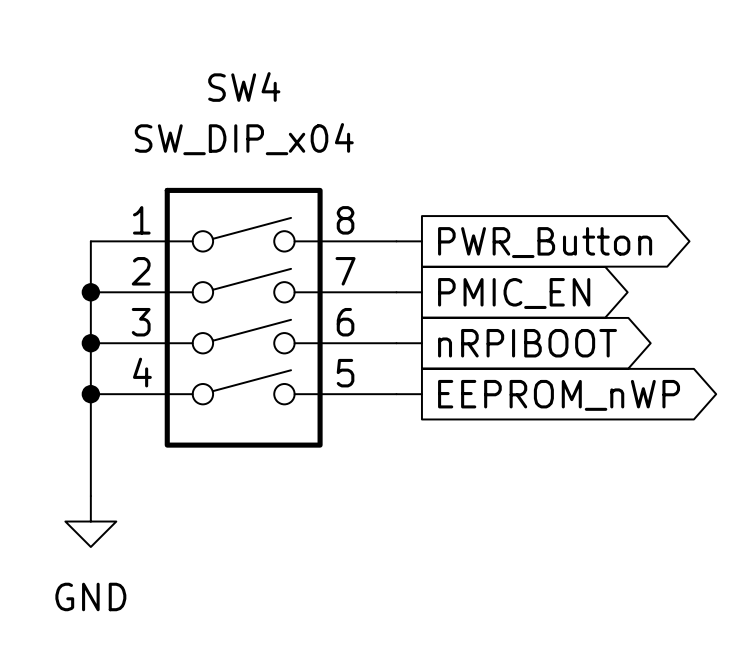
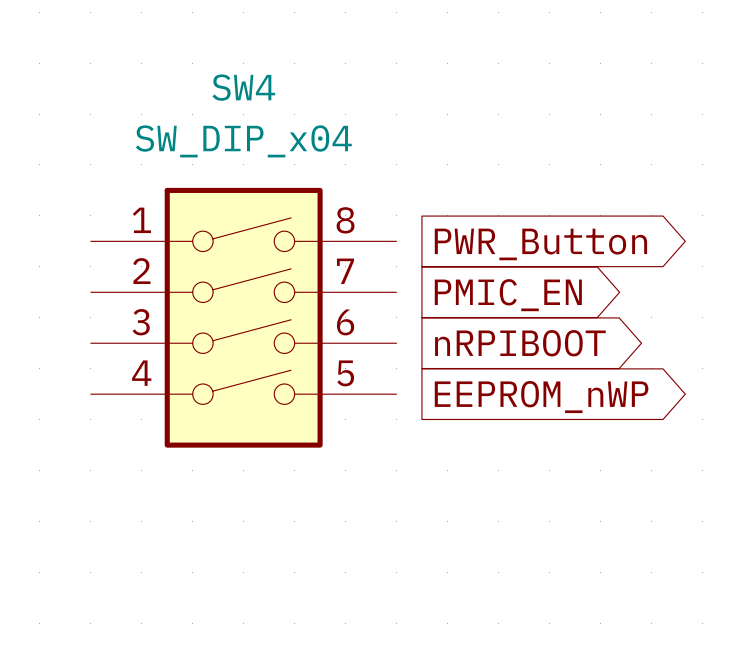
wire: (90, 241) (90, 496) -> none
wire: (396, 241) (421, 241) -> none
junction: (90, 292) -> none
wire: (396, 292) (421, 292) -> none
junction: (90, 343) -> none
wire: (396, 343) (421, 343) -> none
junction: (90, 394) -> none
wire: (396, 394) (421, 394) -> none
power symbol: GND (90, 521) -> none

